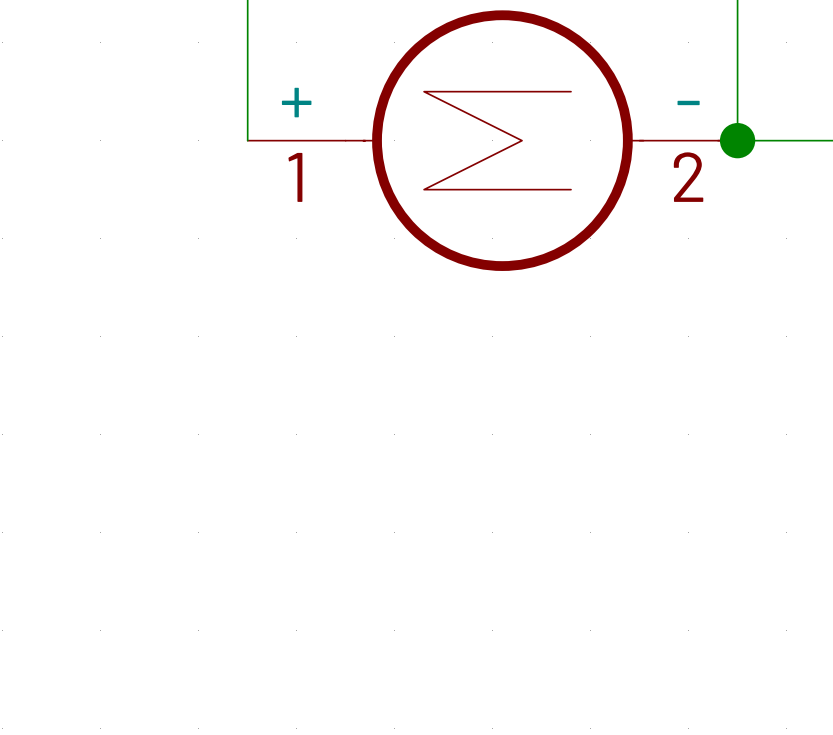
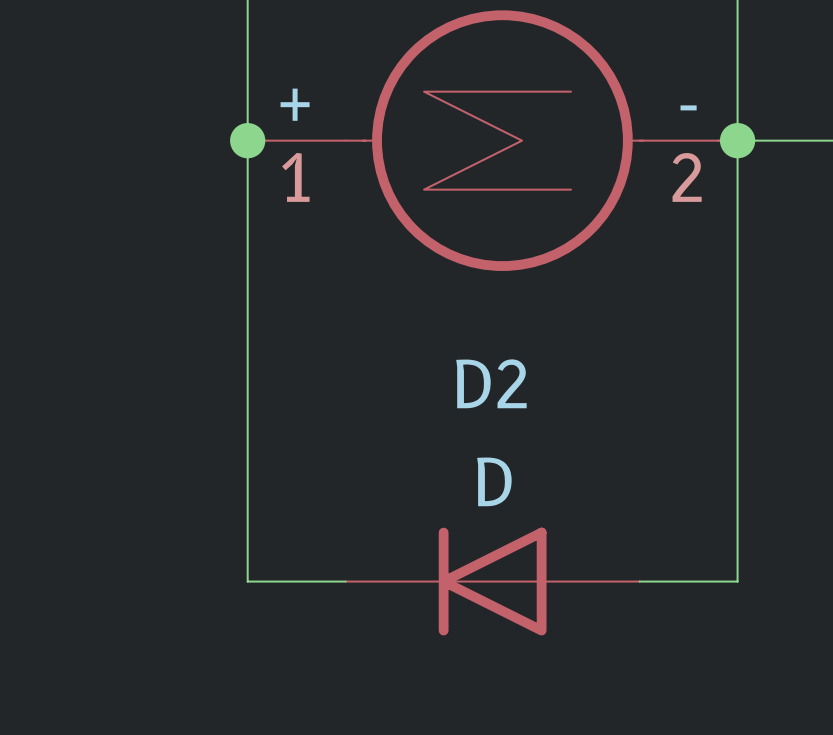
wire: none -> (247, 140) (247, 581) (345, 581)
junction: none -> (247, 140)
wire: none -> (737, 140) (737, 581) (639, 581)
D2: none -> D (492, 581)

